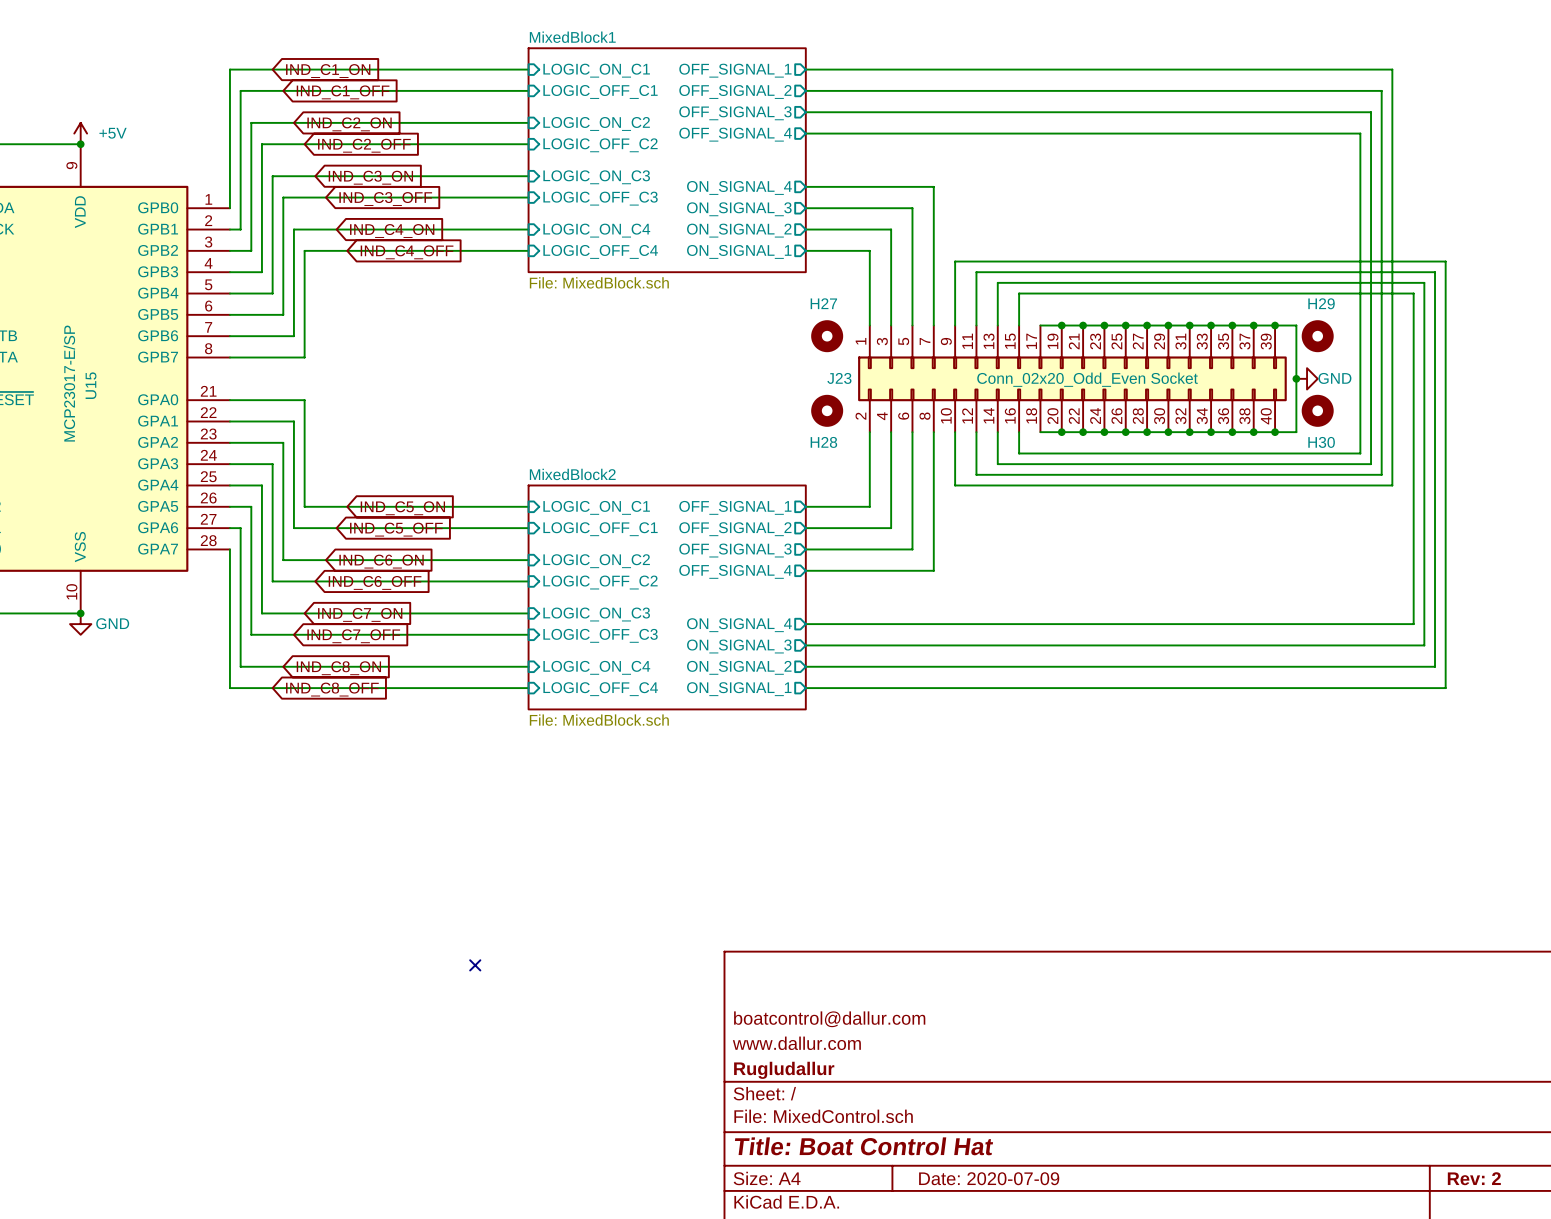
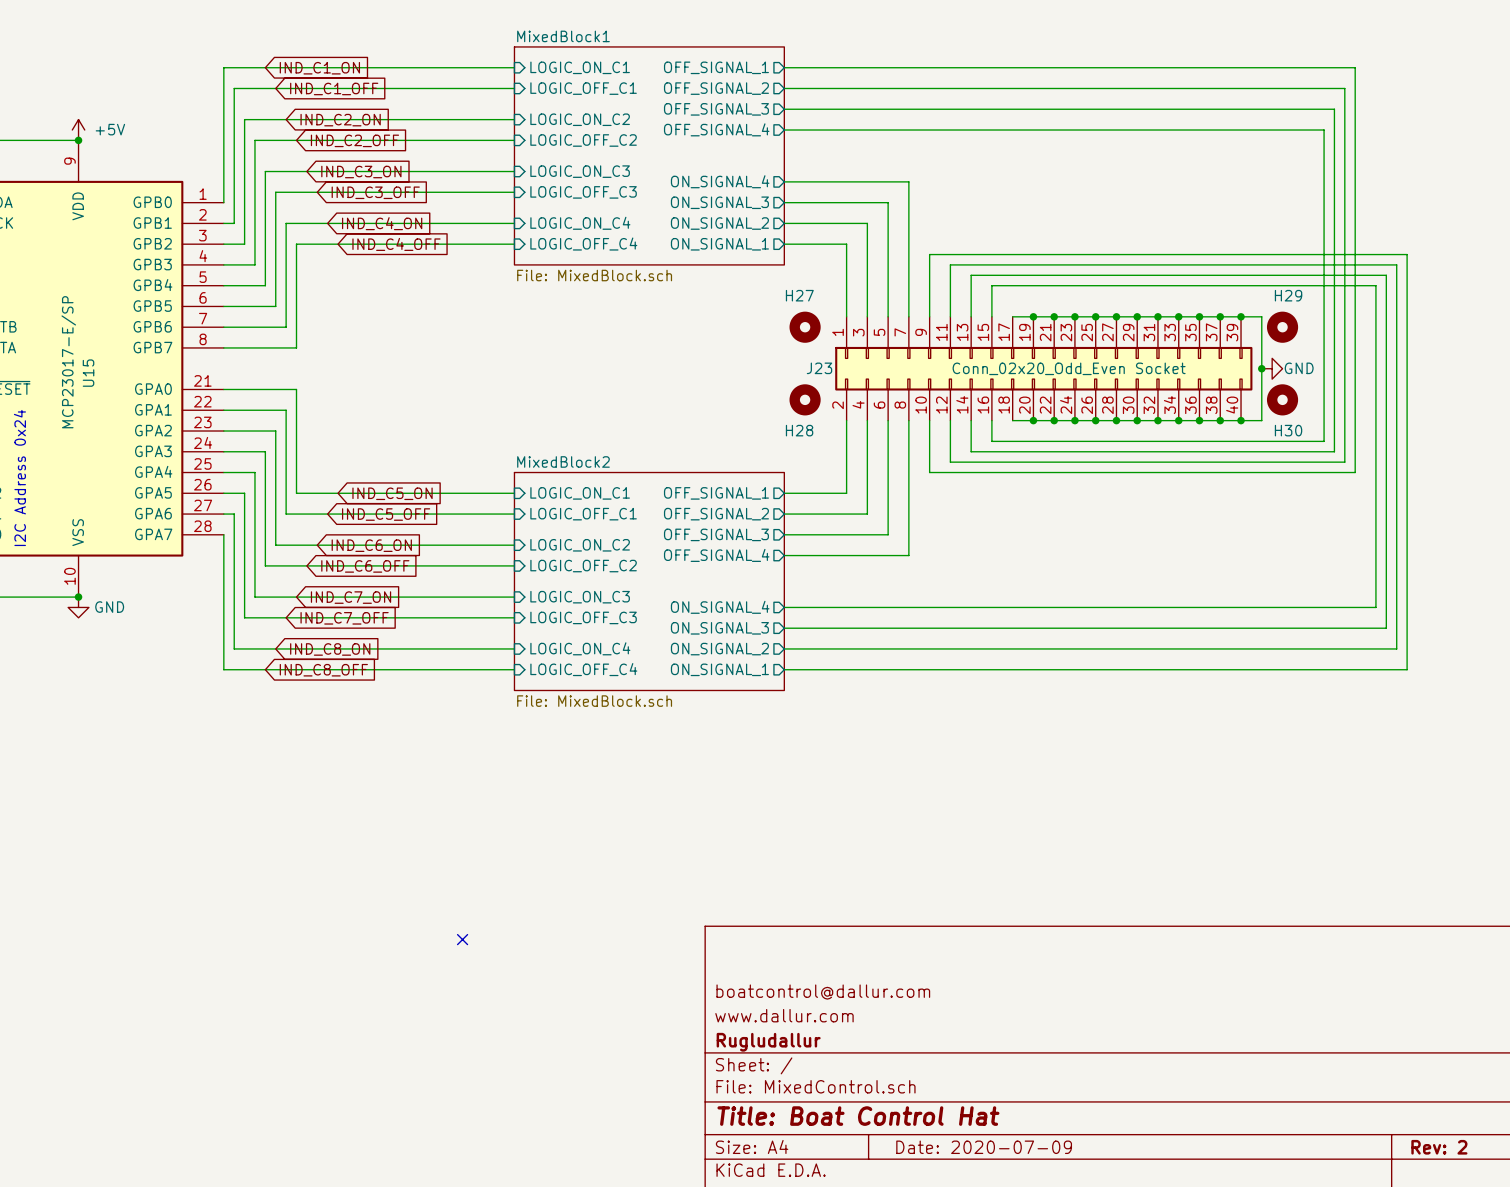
text: none -> I2C Address 0x24 (19, 477)

